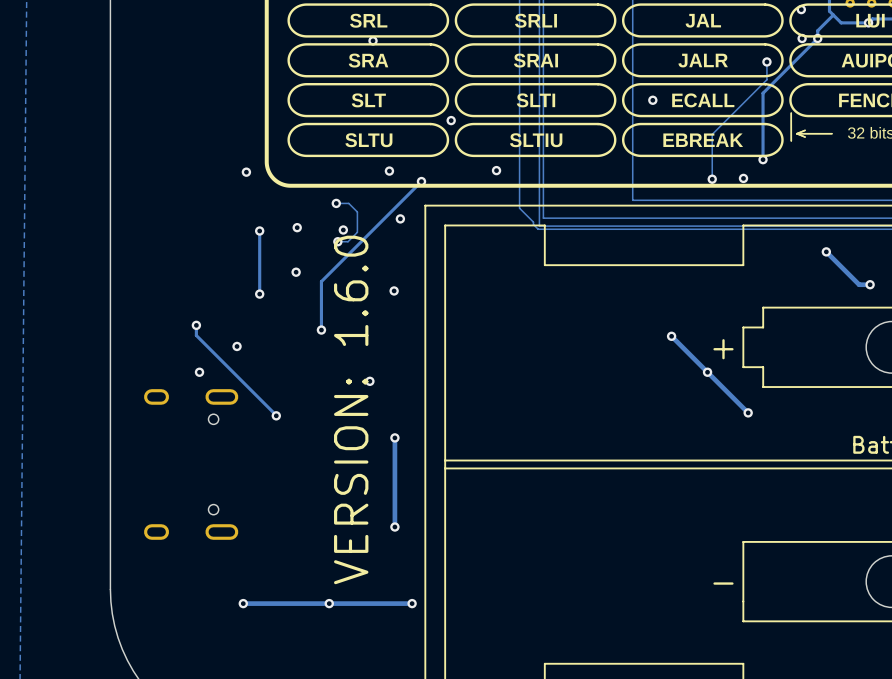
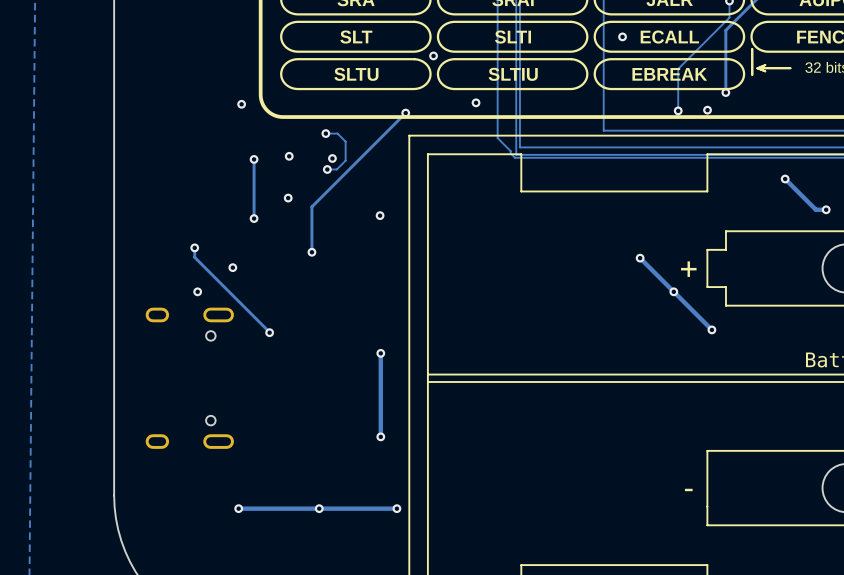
via: (389, 171) -> none
via: (400, 218) -> none
via: (369, 381) -> none
text: VERSION: 1.6.0 (351, 409) -> none

